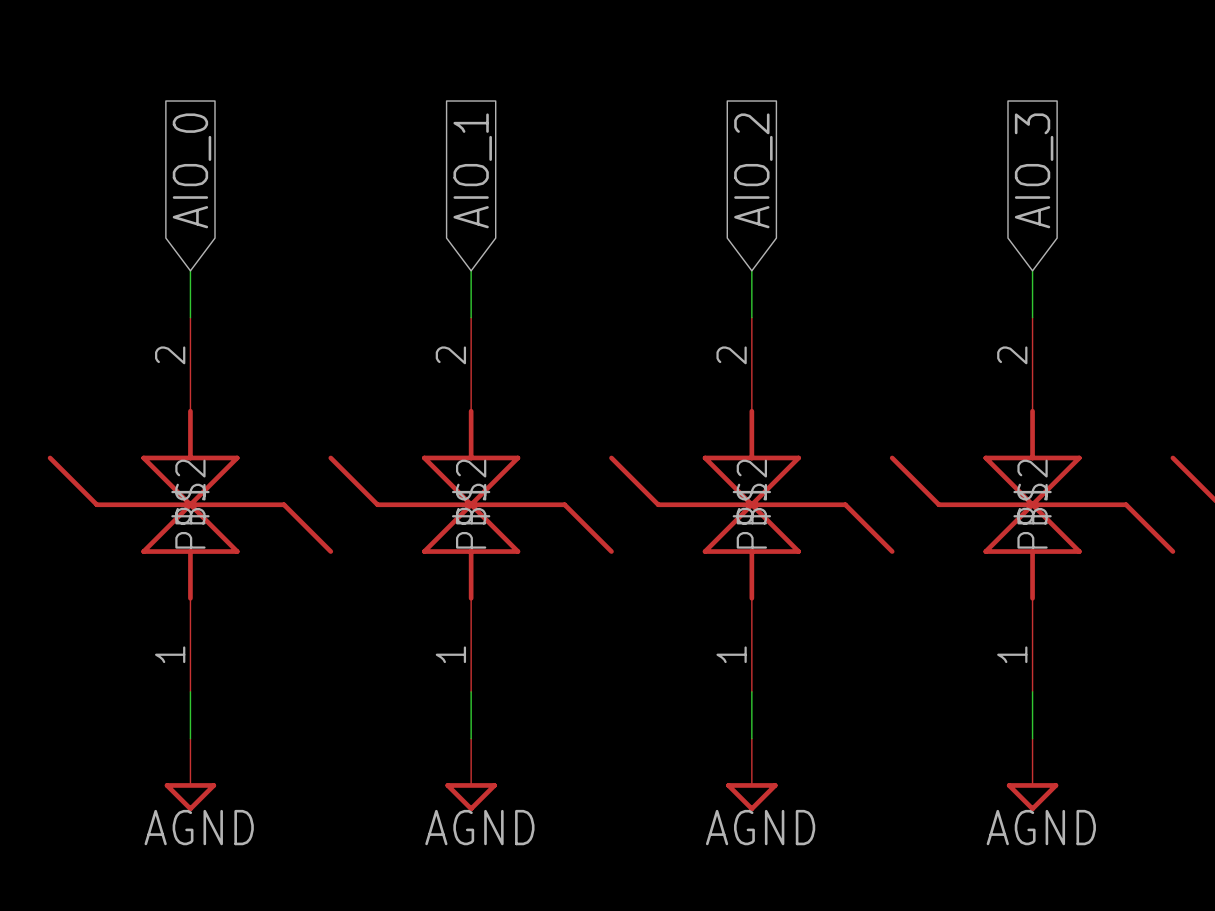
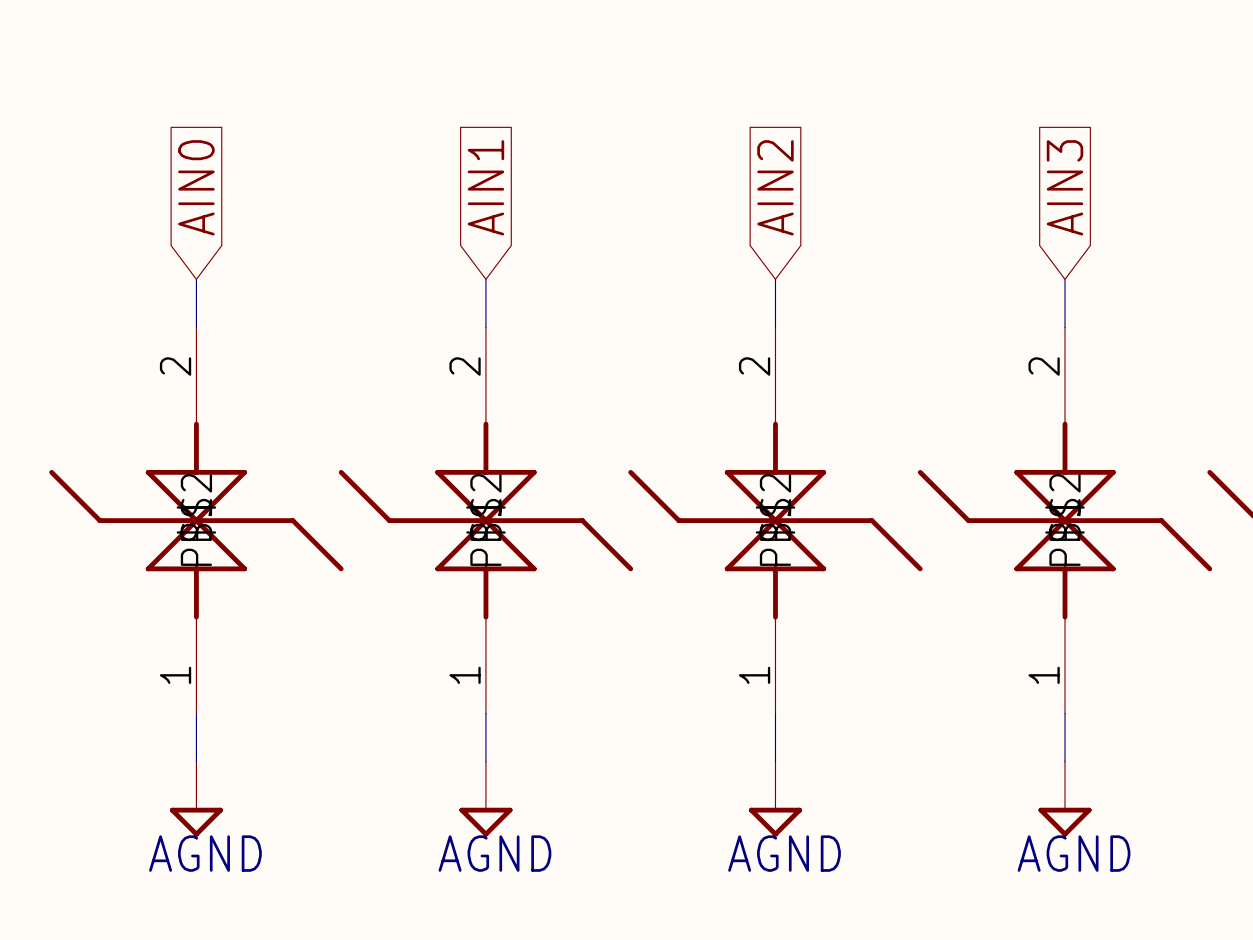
global label: AIO_0 (192, 170) -> AIN0 (196, 187)
global label: AIO_1 (472, 170) -> AIN1 (485, 187)
global label: AIO_2 (753, 170) -> AIN2 (775, 187)
global label: AIO_3 (1034, 170) -> AIN3 (1065, 187)

